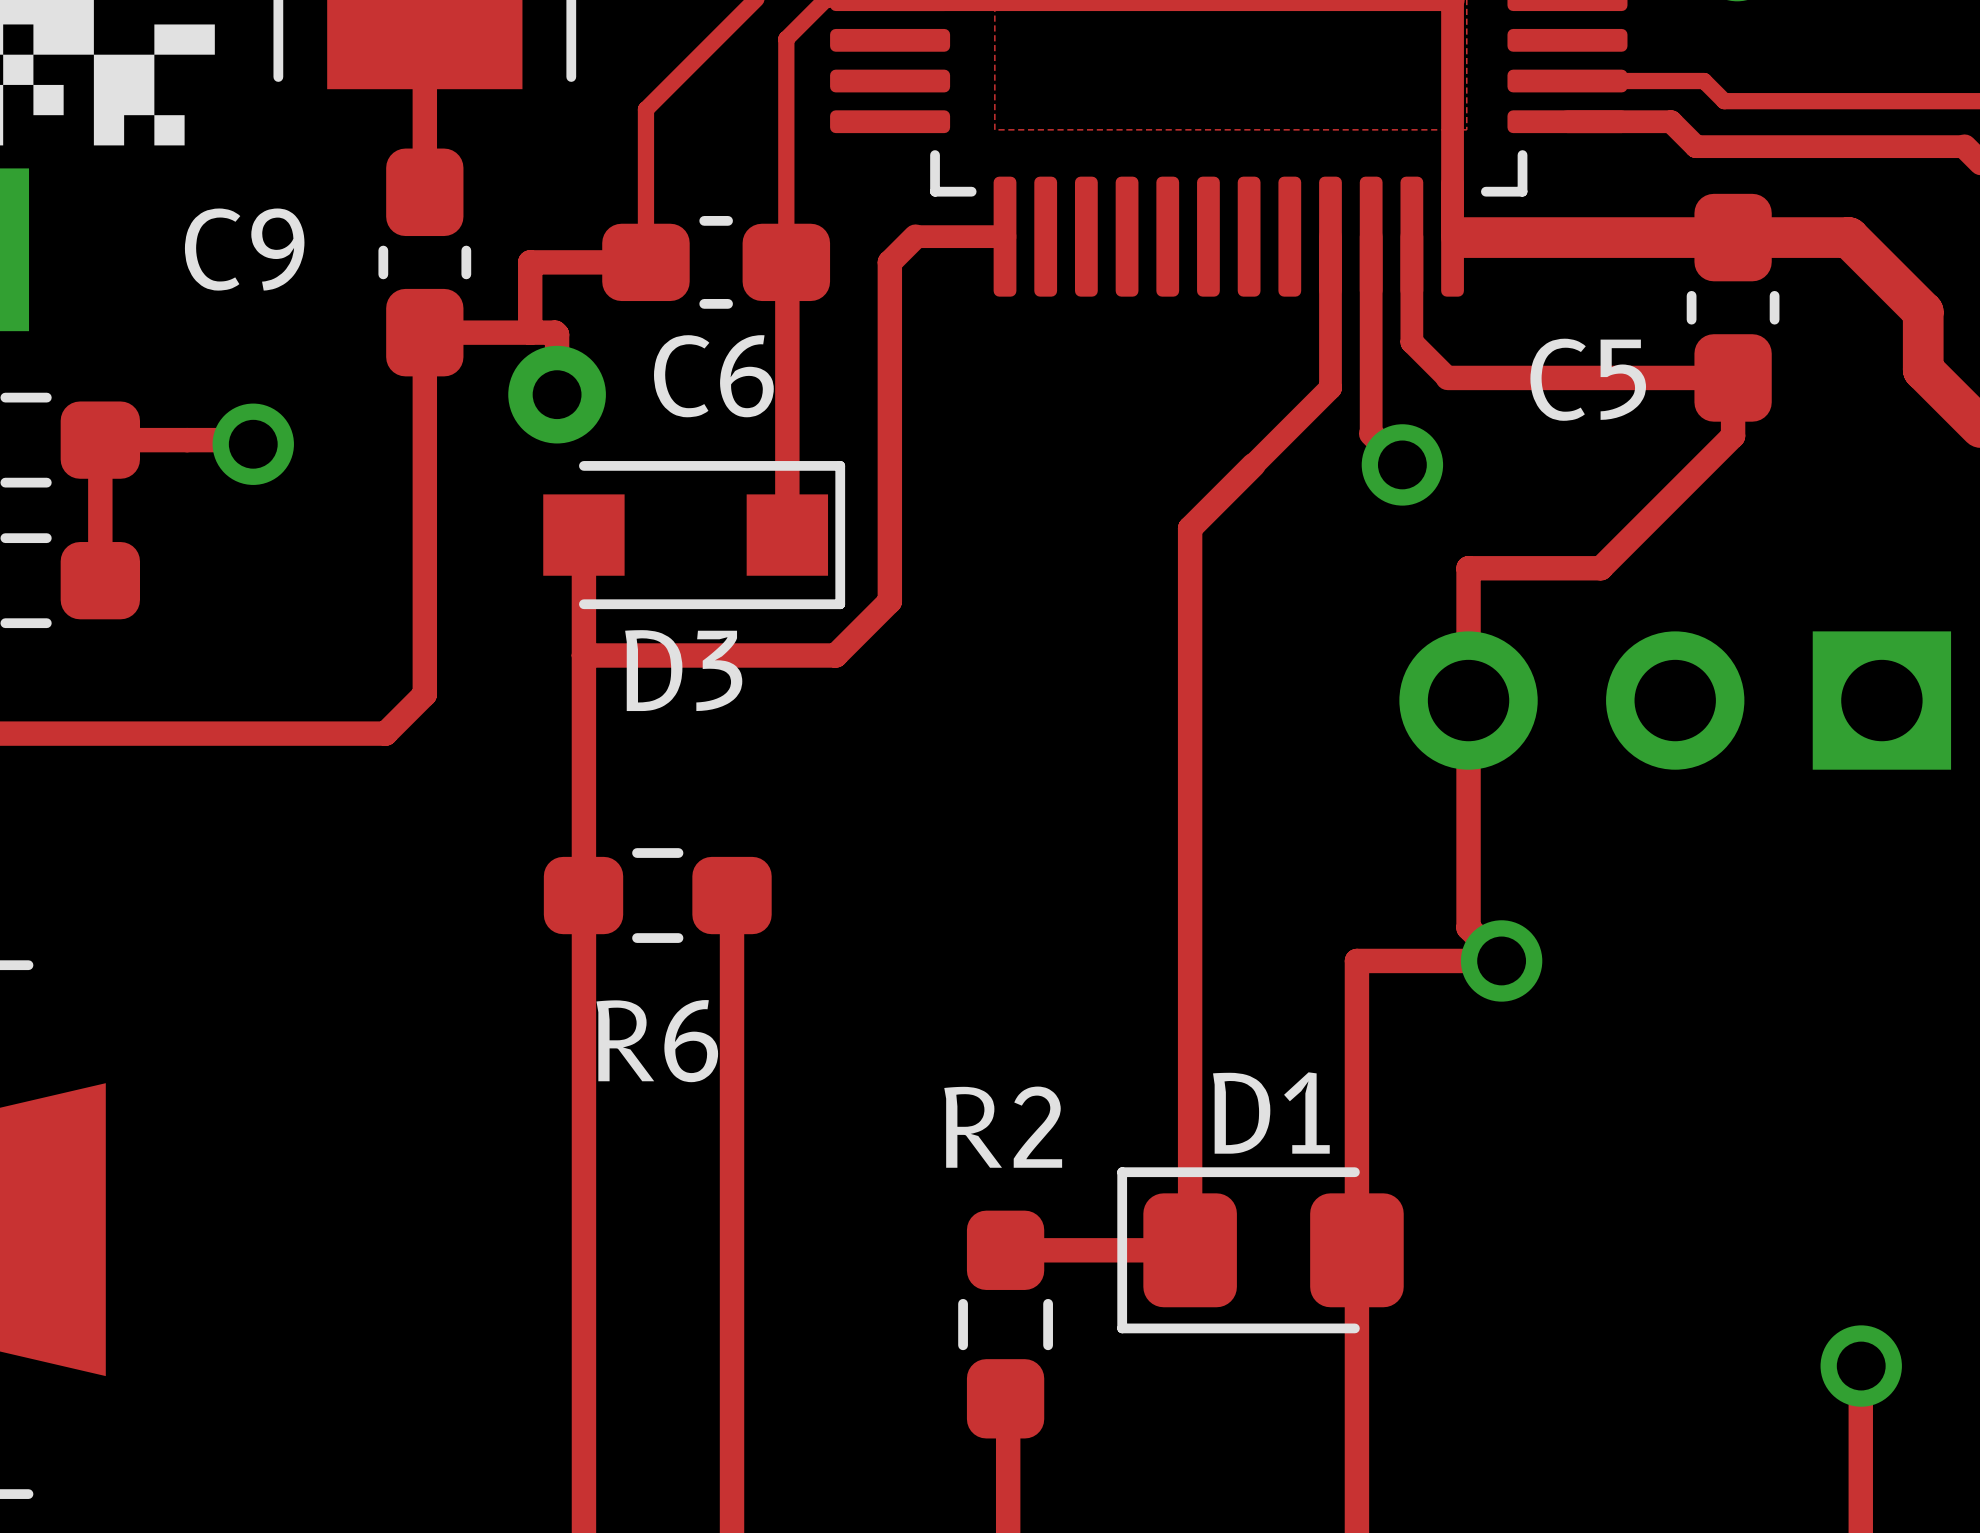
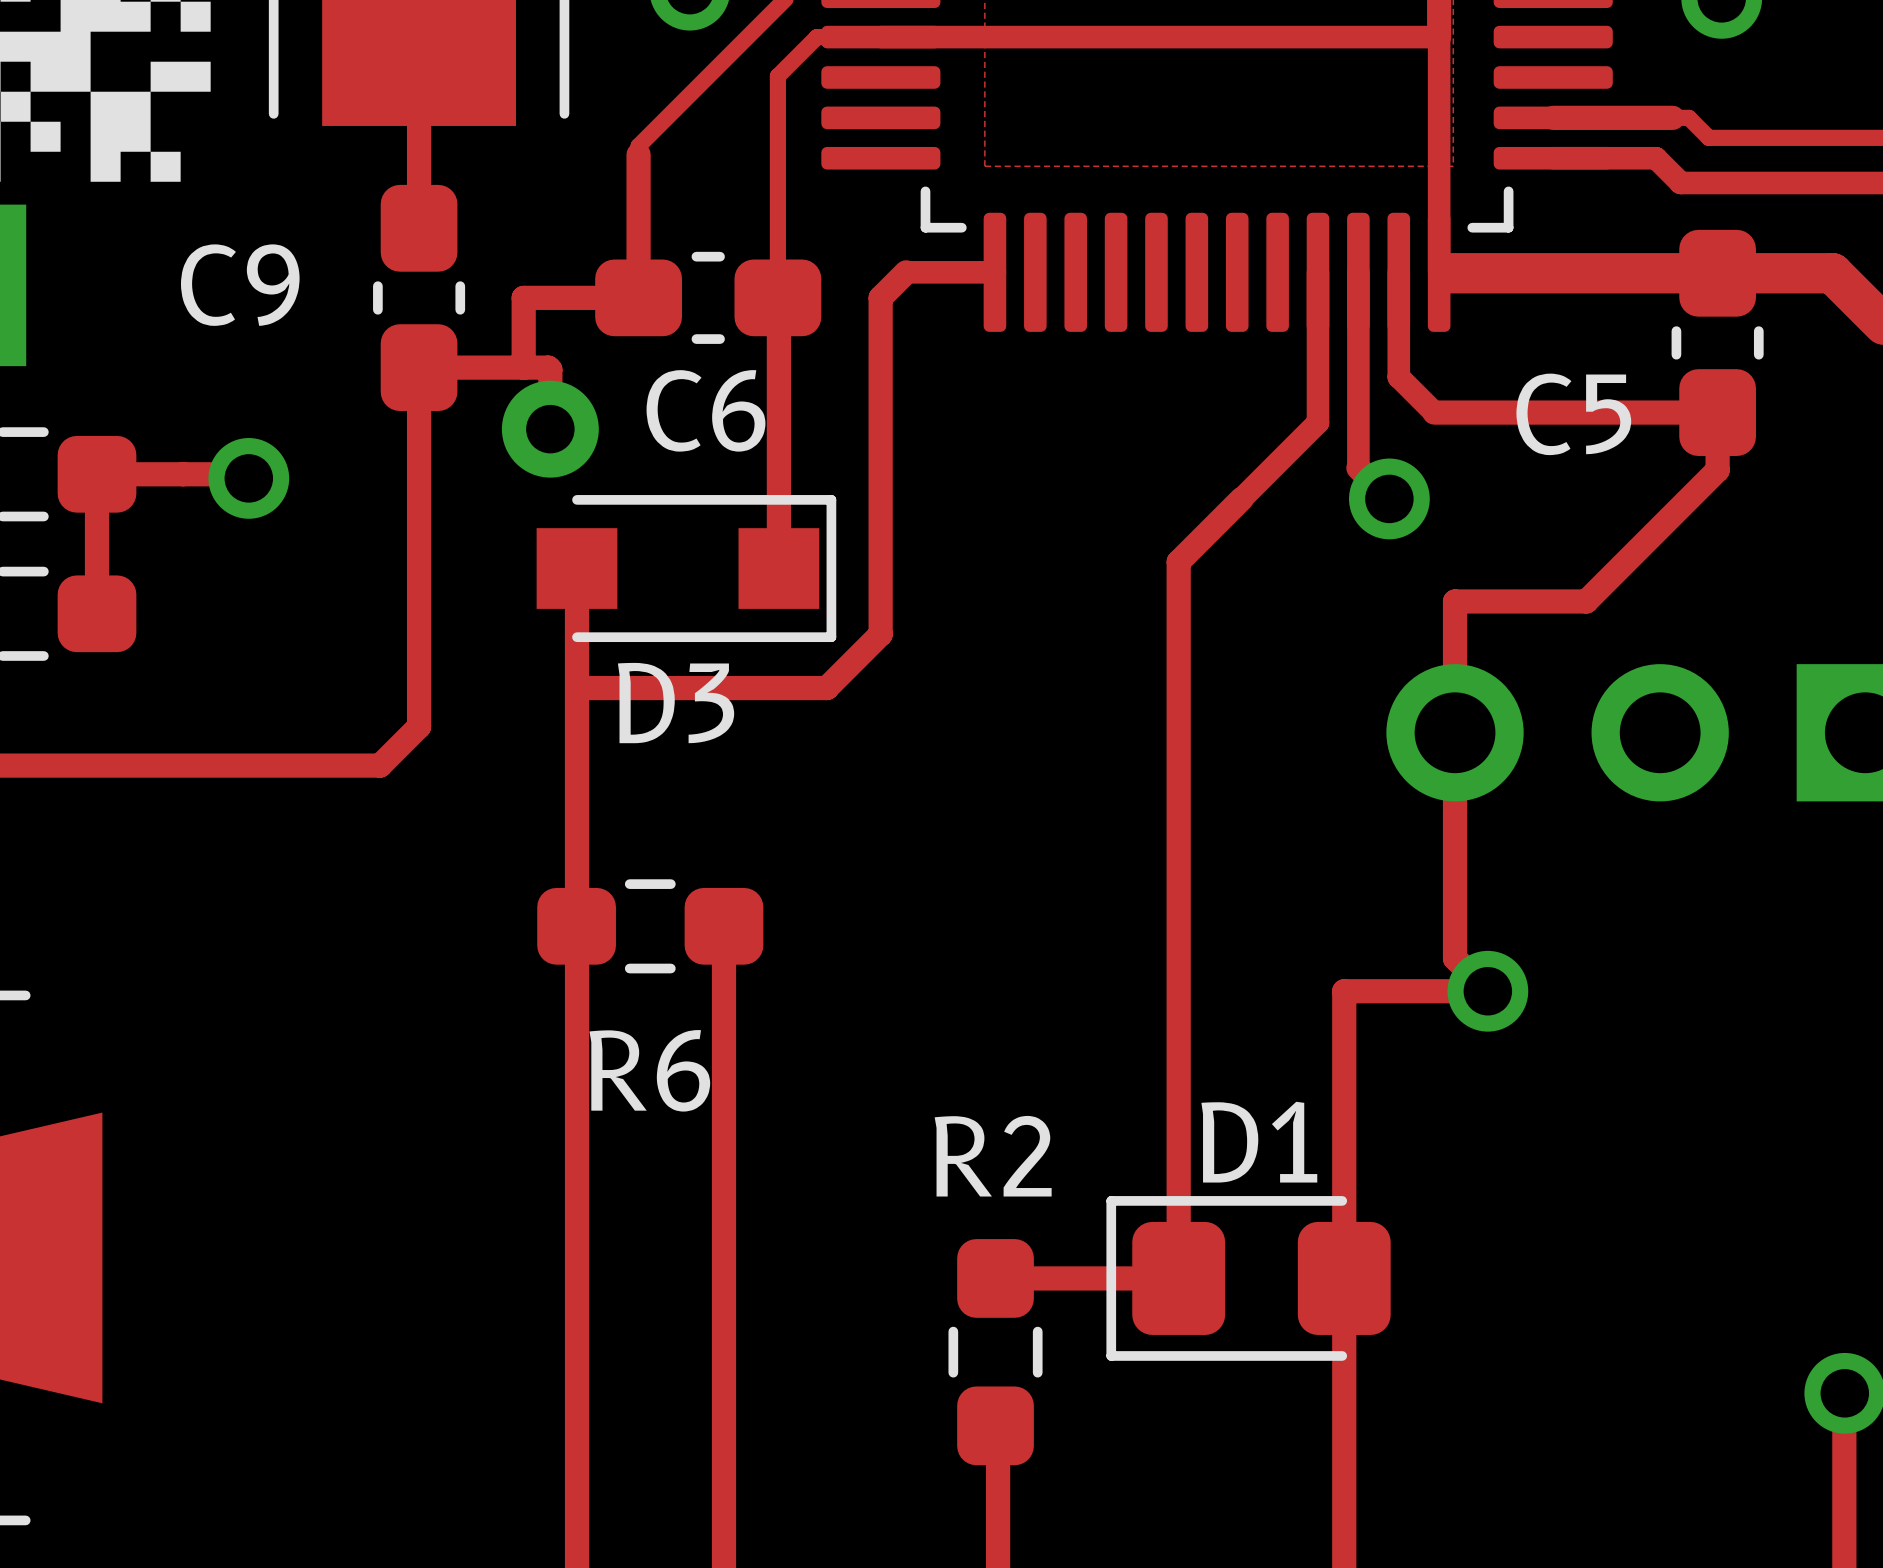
track width: thin (1567, 81) (1687, 81) -> thick (1553, 117) (1672, 117)
track width: thin (645, 118) (645, 262) -> thick (638, 154) (638, 297)

